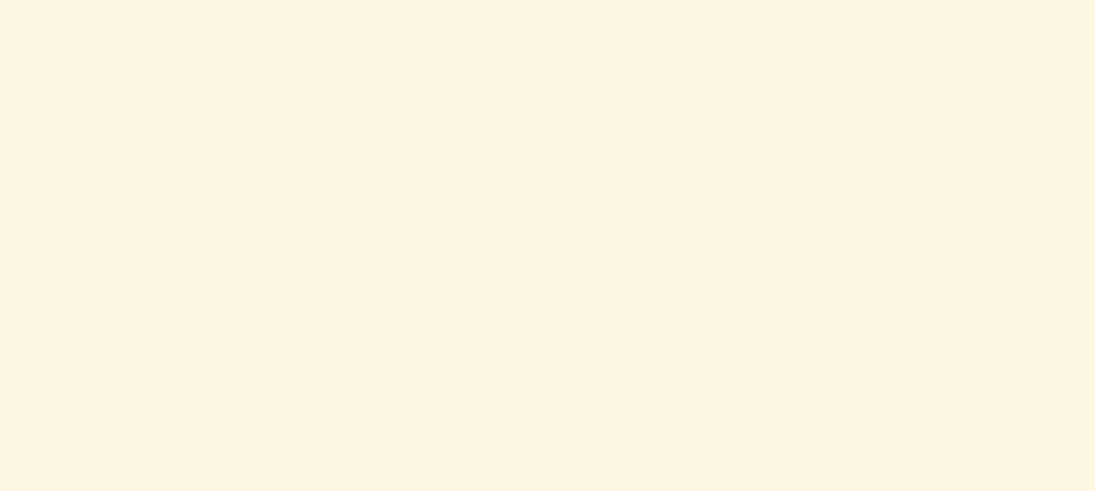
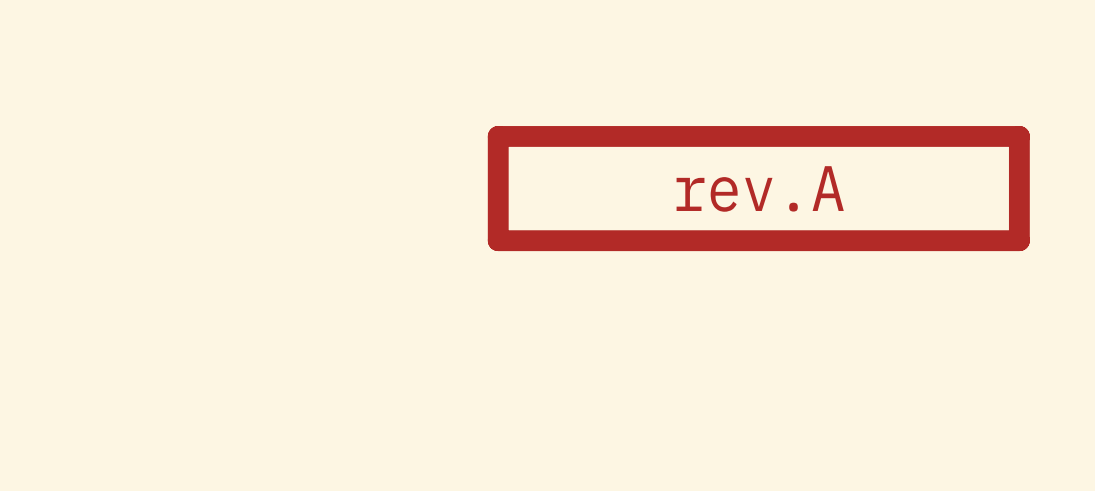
part: none -> rev.A (758, 188)

